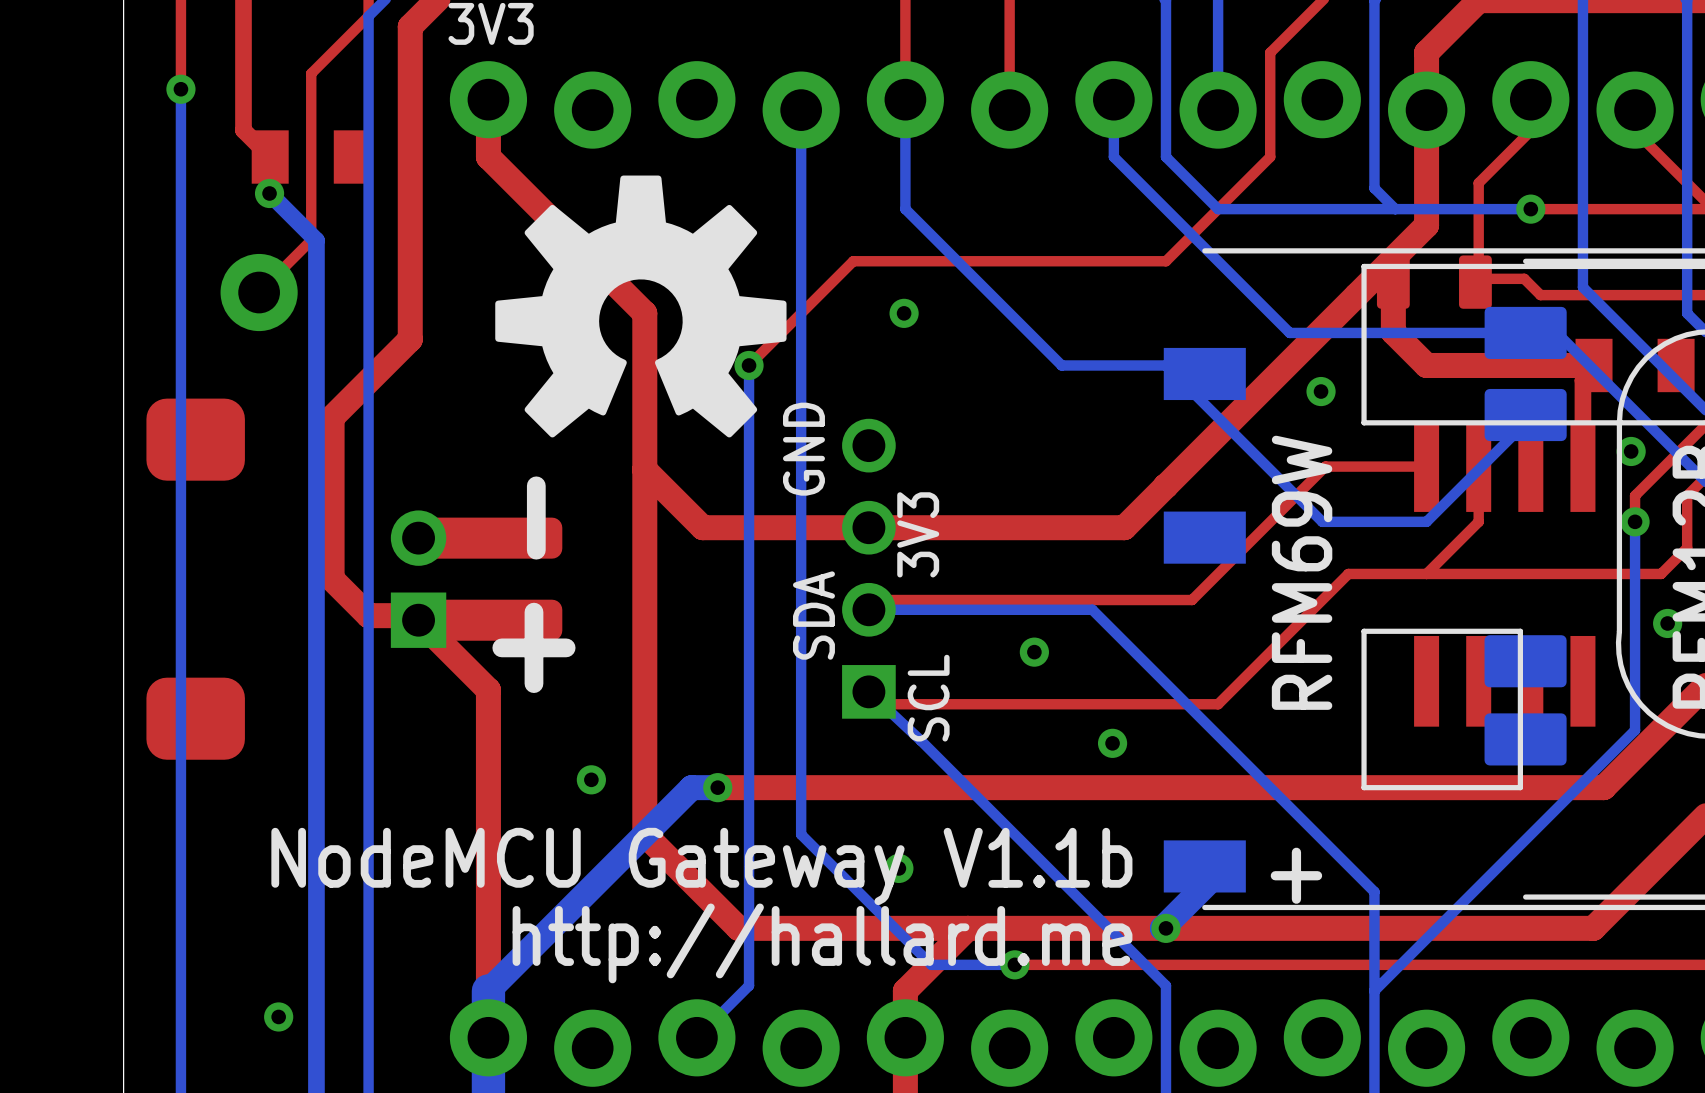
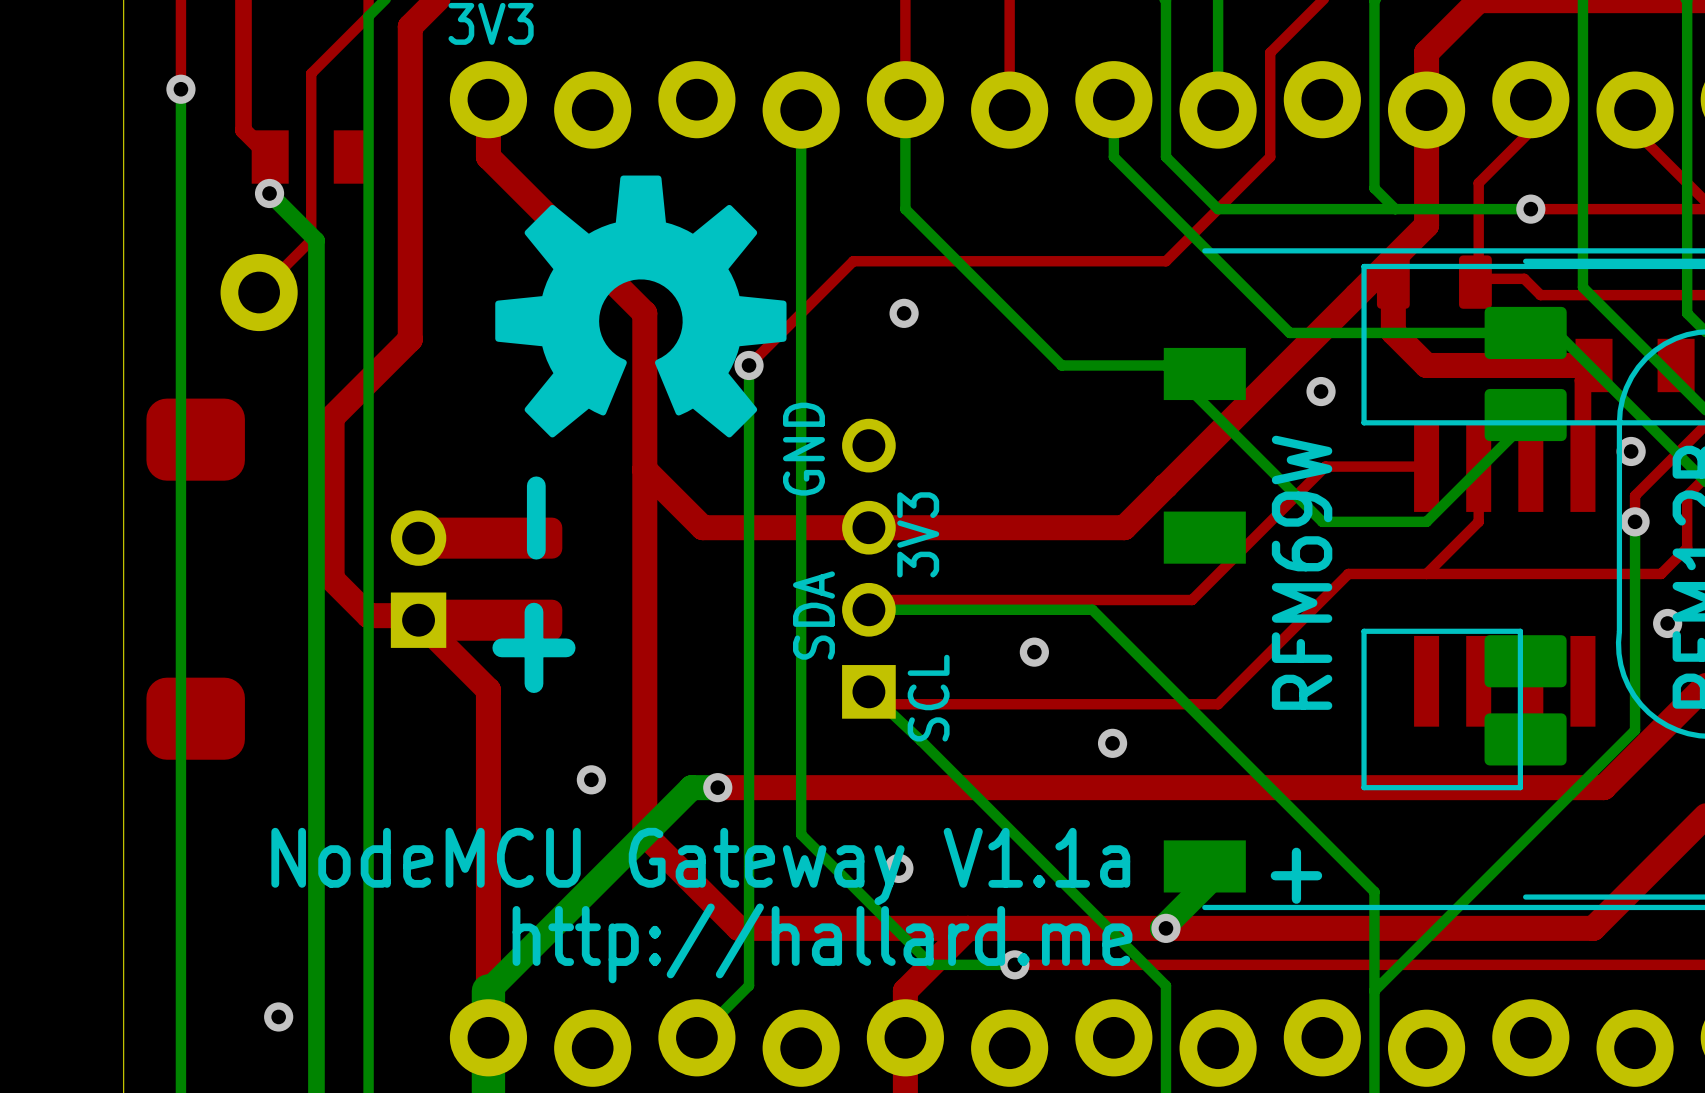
text: NodeMCU Gateway V1.1b (701, 866) -> NodeMCU Gateway V1.1a (700, 866)

